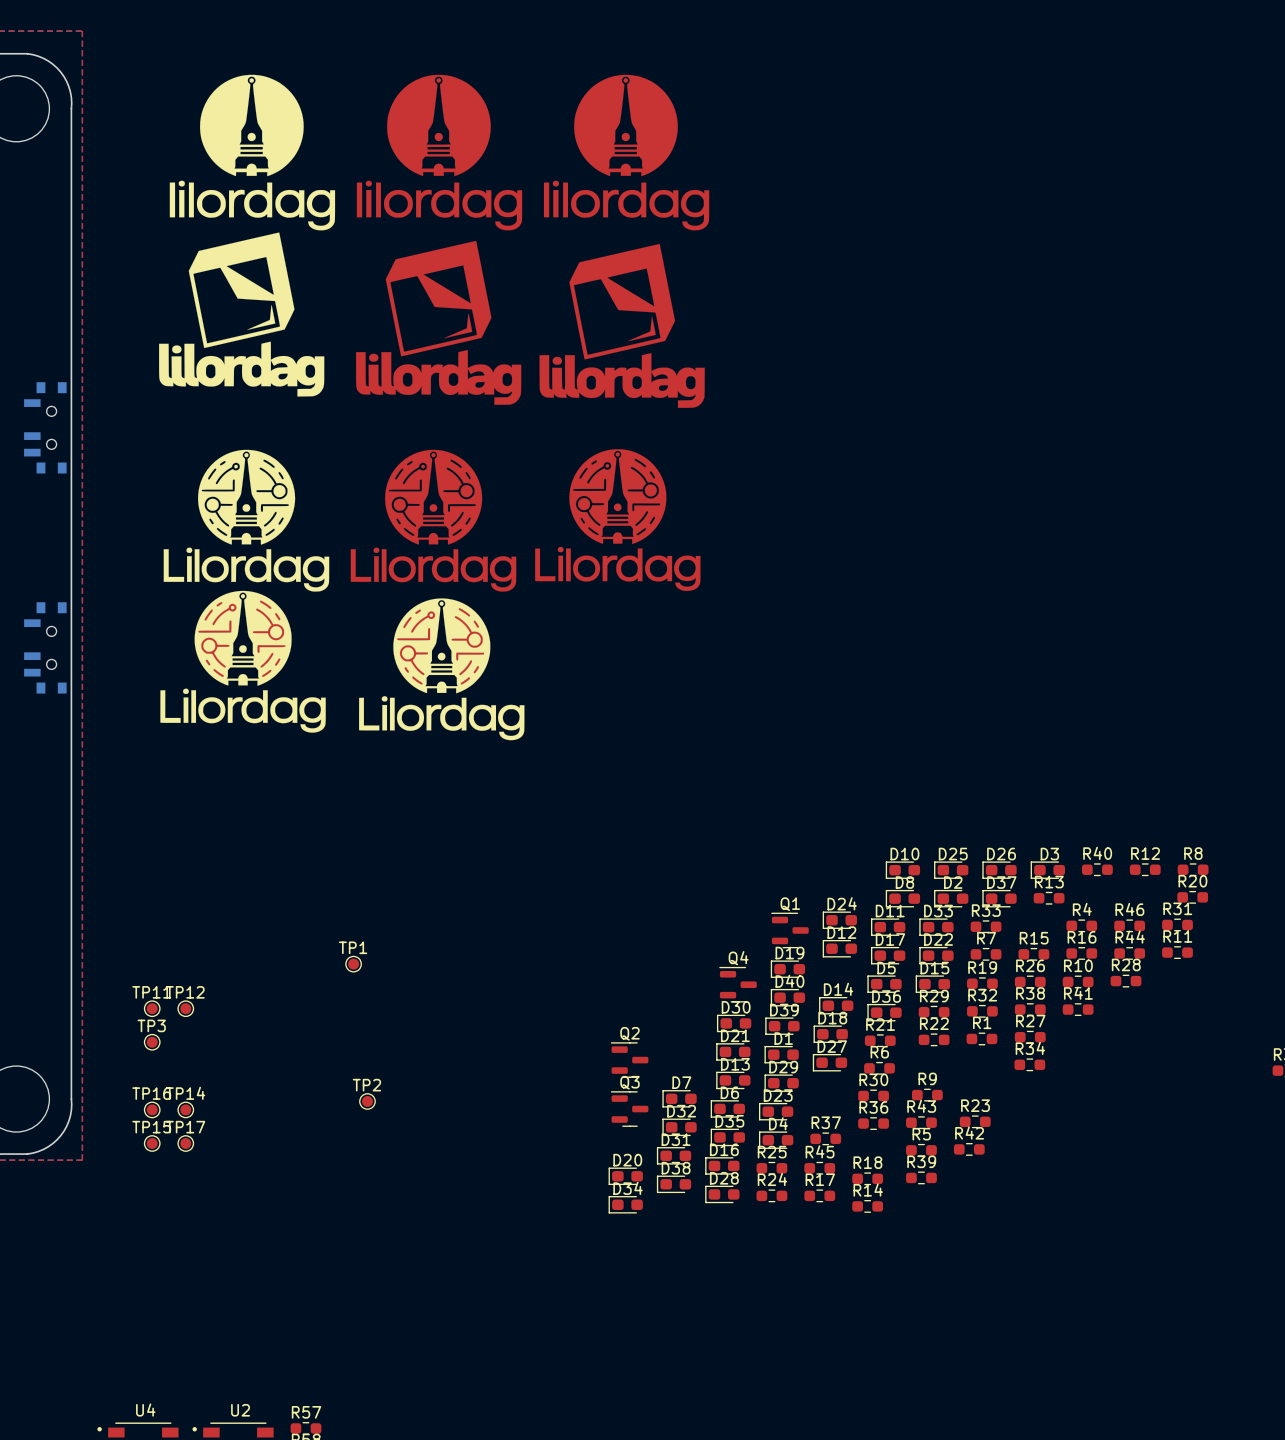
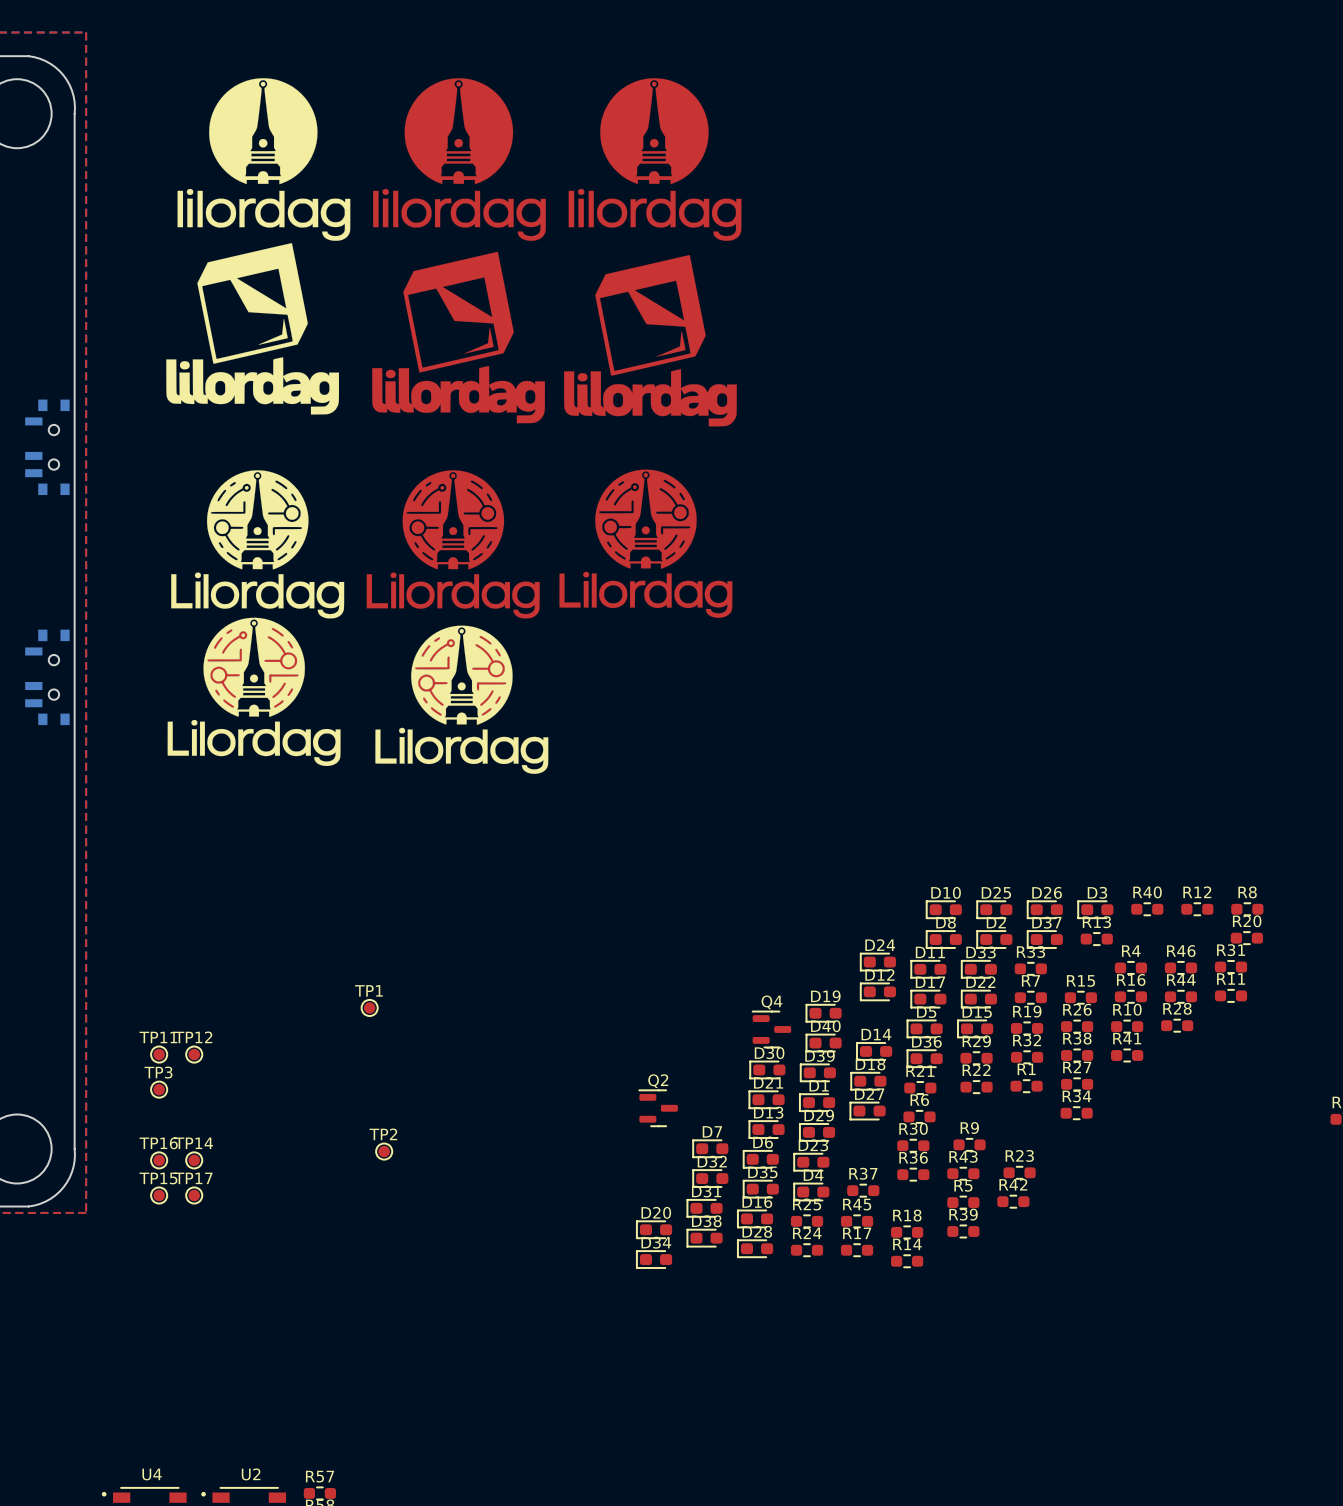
Q1: (789, 930) -> none
Q3: (629, 1109) -> none

